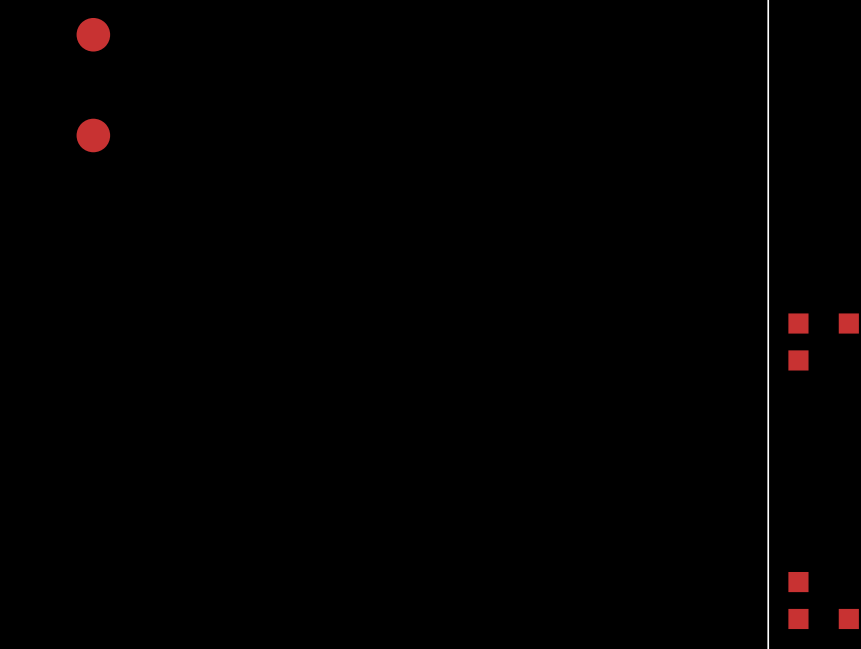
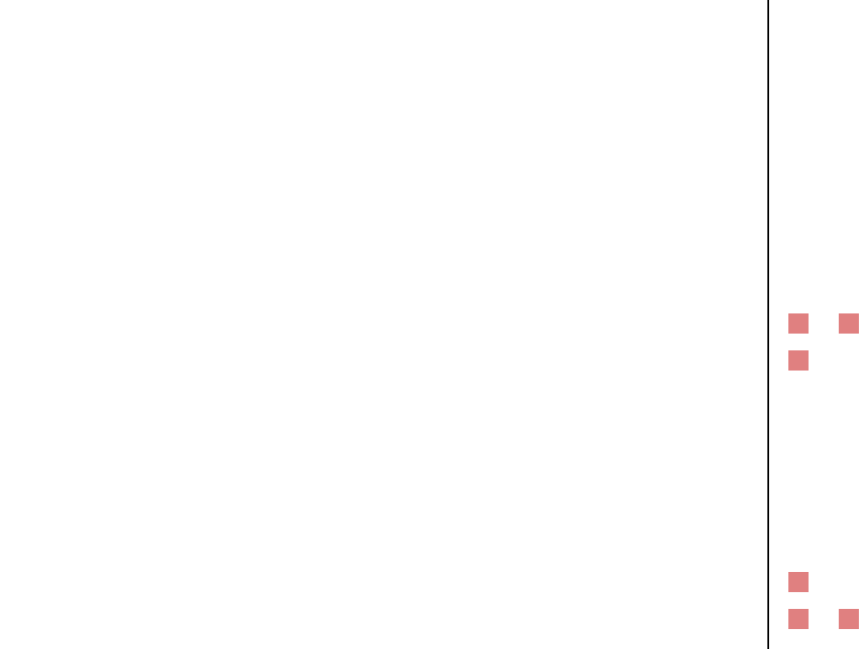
part: (93, 34) -> none
part: (93, 135) -> none

